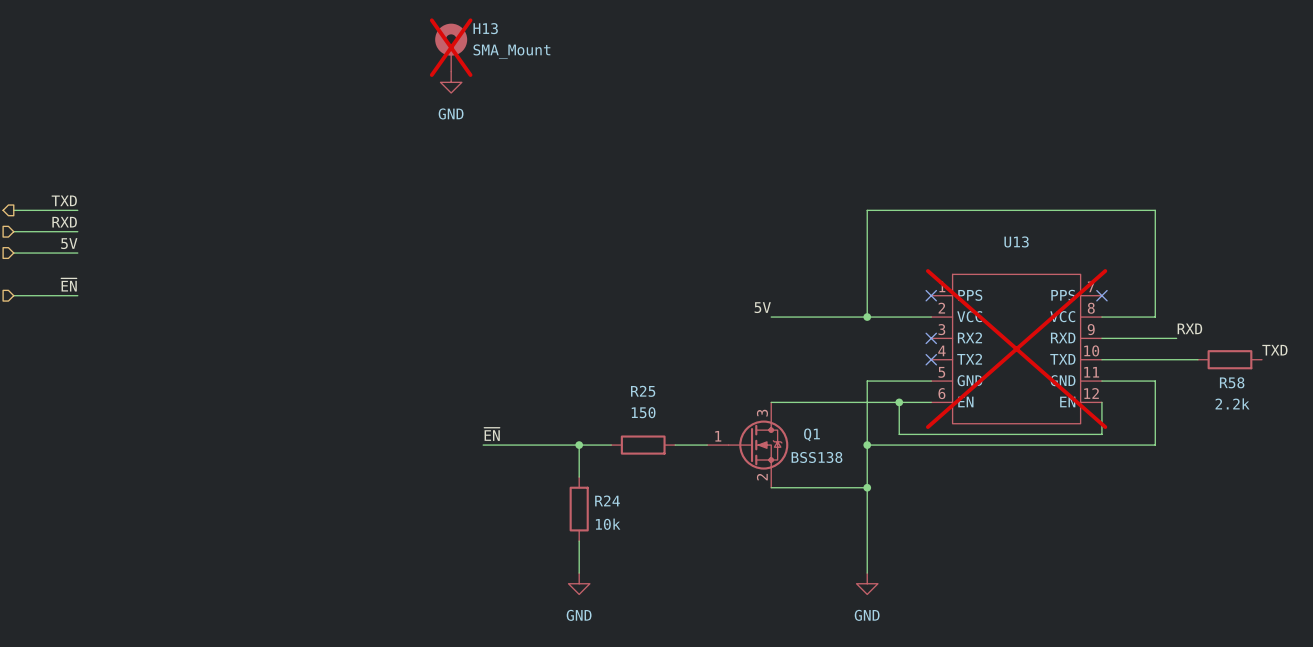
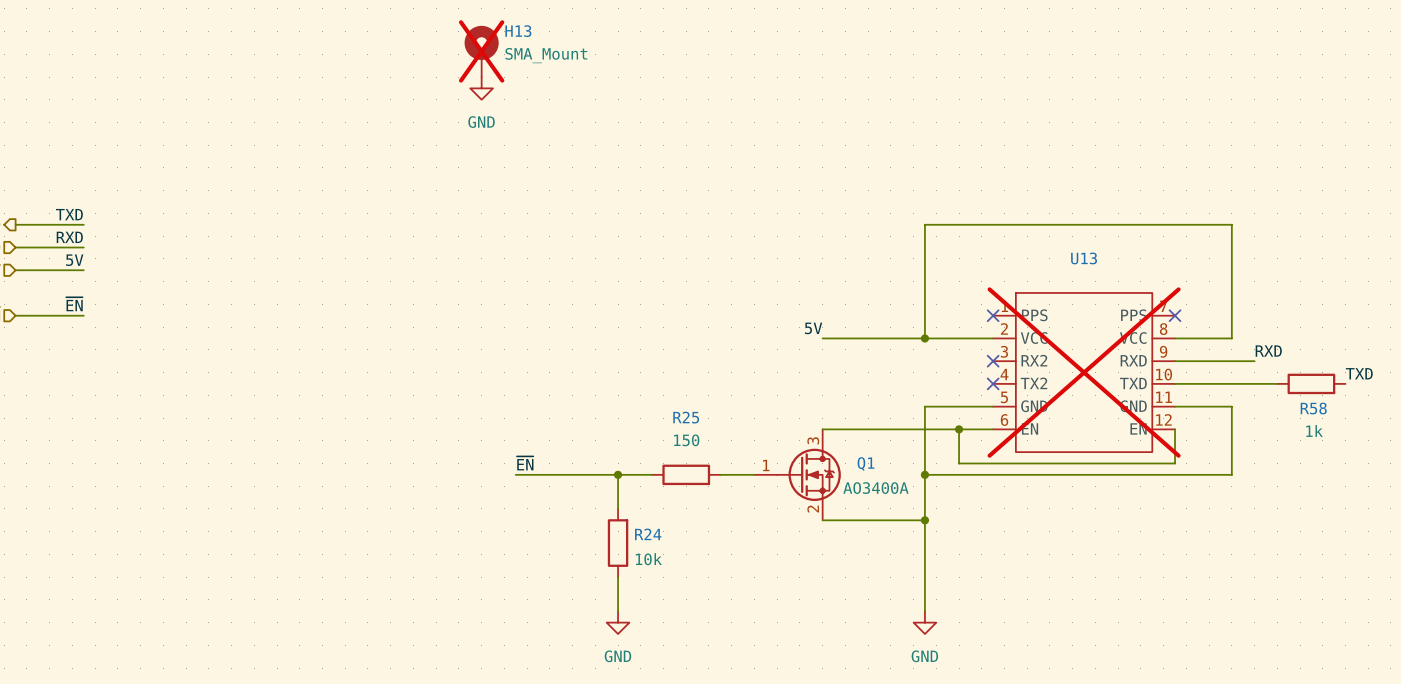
R58 value: 2.2k (1232, 403) -> 1k (1314, 430)
Q1 value: BSS138 (816, 457) -> AO3400A (875, 488)

